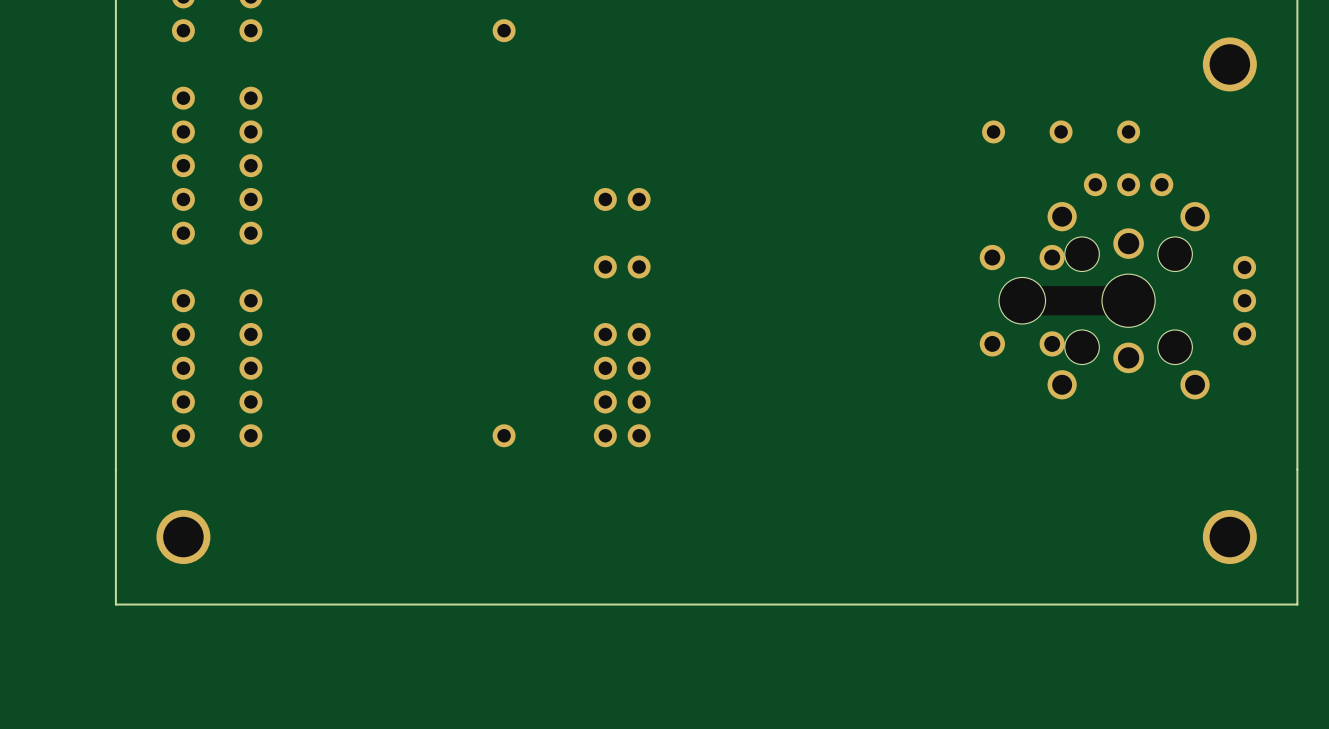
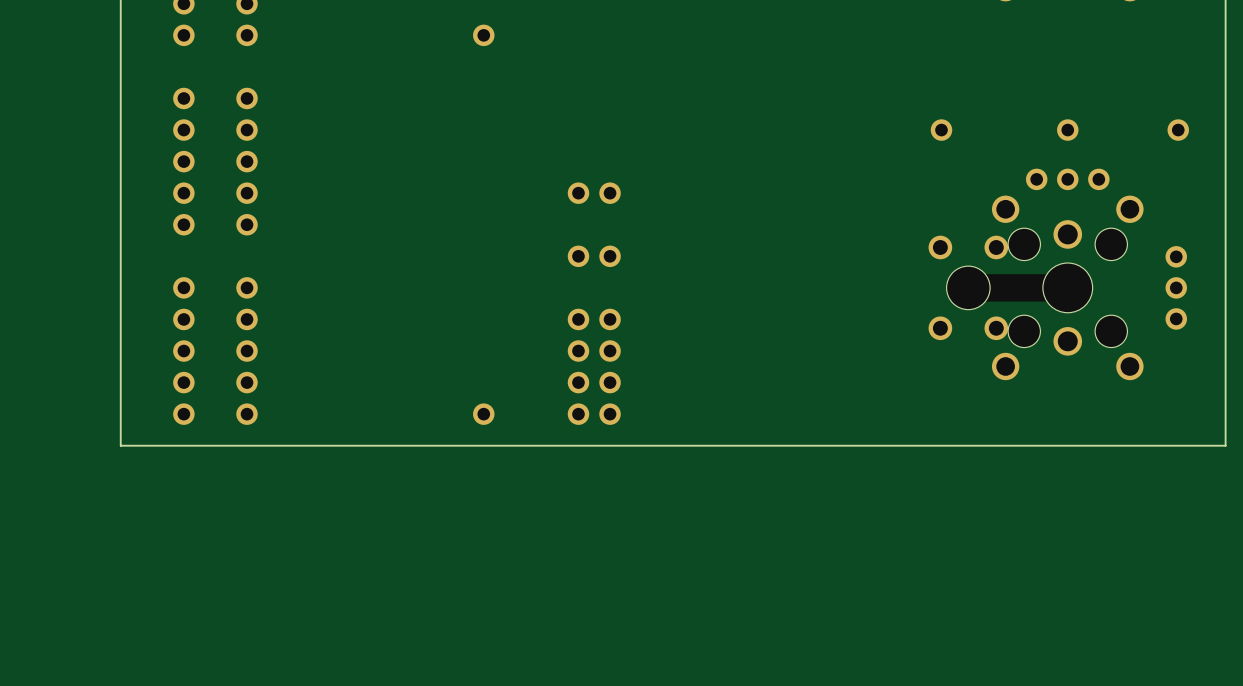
part: (1229, 64) -> none
part position: (1061, 131) -> (1178, 130)
board edge: (1297, 469) (1297, 604) (115, 604) (115, 469) -> (1225, 445) (120, 445)
part: (183, 537) -> none
part: (1229, 537) -> none

